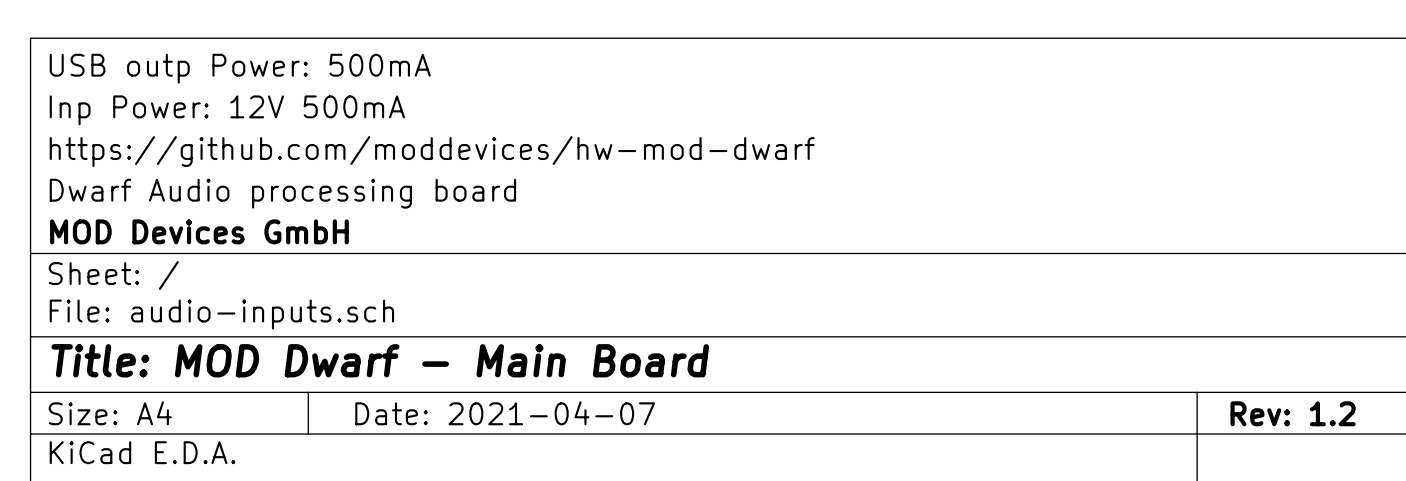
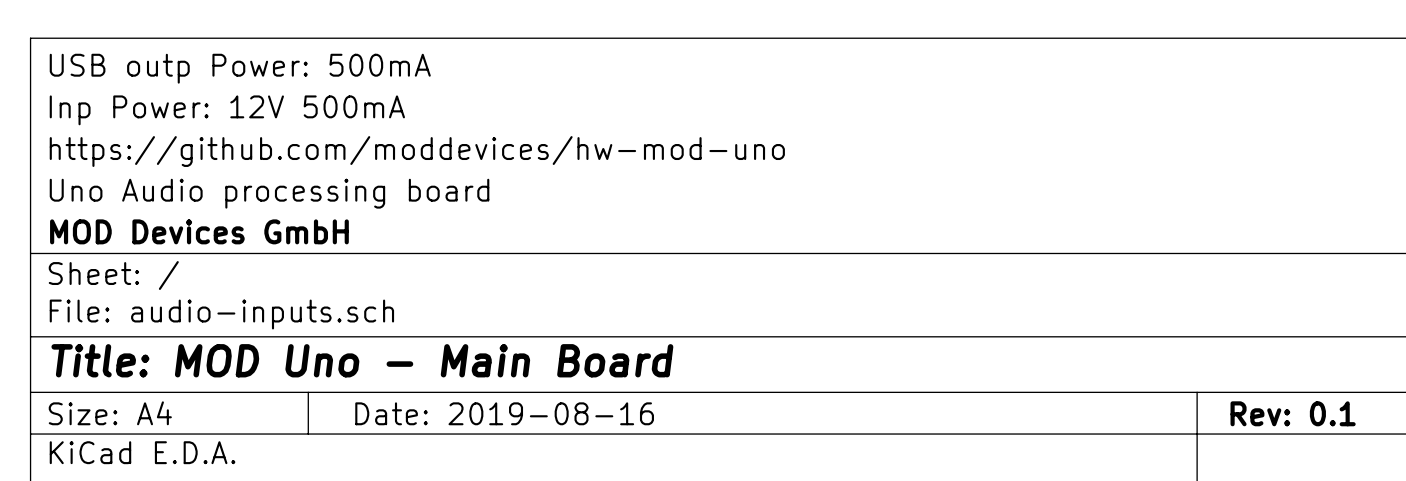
title block: https://github.com/moddevices/hw-mod-dwarf (432, 151) -> https://github.com/moddevices/hw-mod-uno (417, 151)
title block: Dwarf Audio processing board (282, 193) -> Uno Audio processing board (269, 193)
title block: Title: MOD Dwarf - Main Board (380, 360) -> Title: MOD Uno - Main Board (362, 360)
title block: Date: 2021-04-07 (505, 413) -> Date: 2019-08-16 (504, 413)
title block: Rev: 1.2 (1293, 413) -> Rev: 0.1 (1293, 413)

